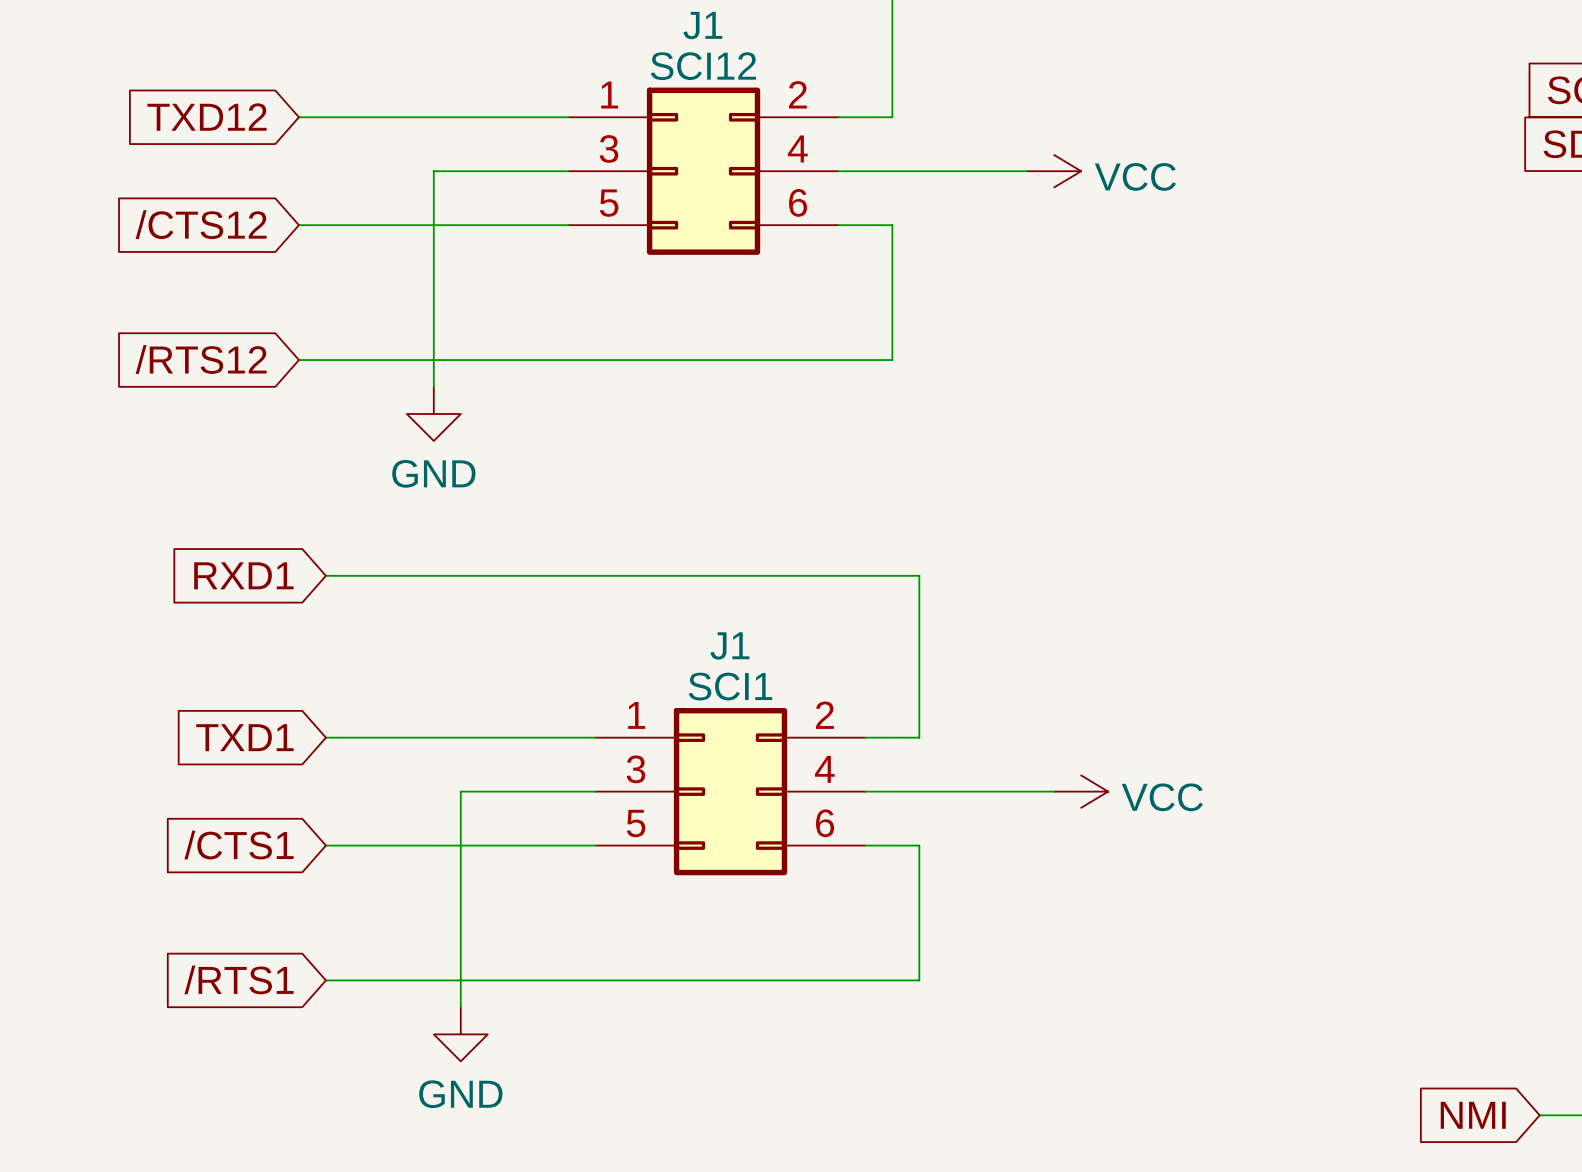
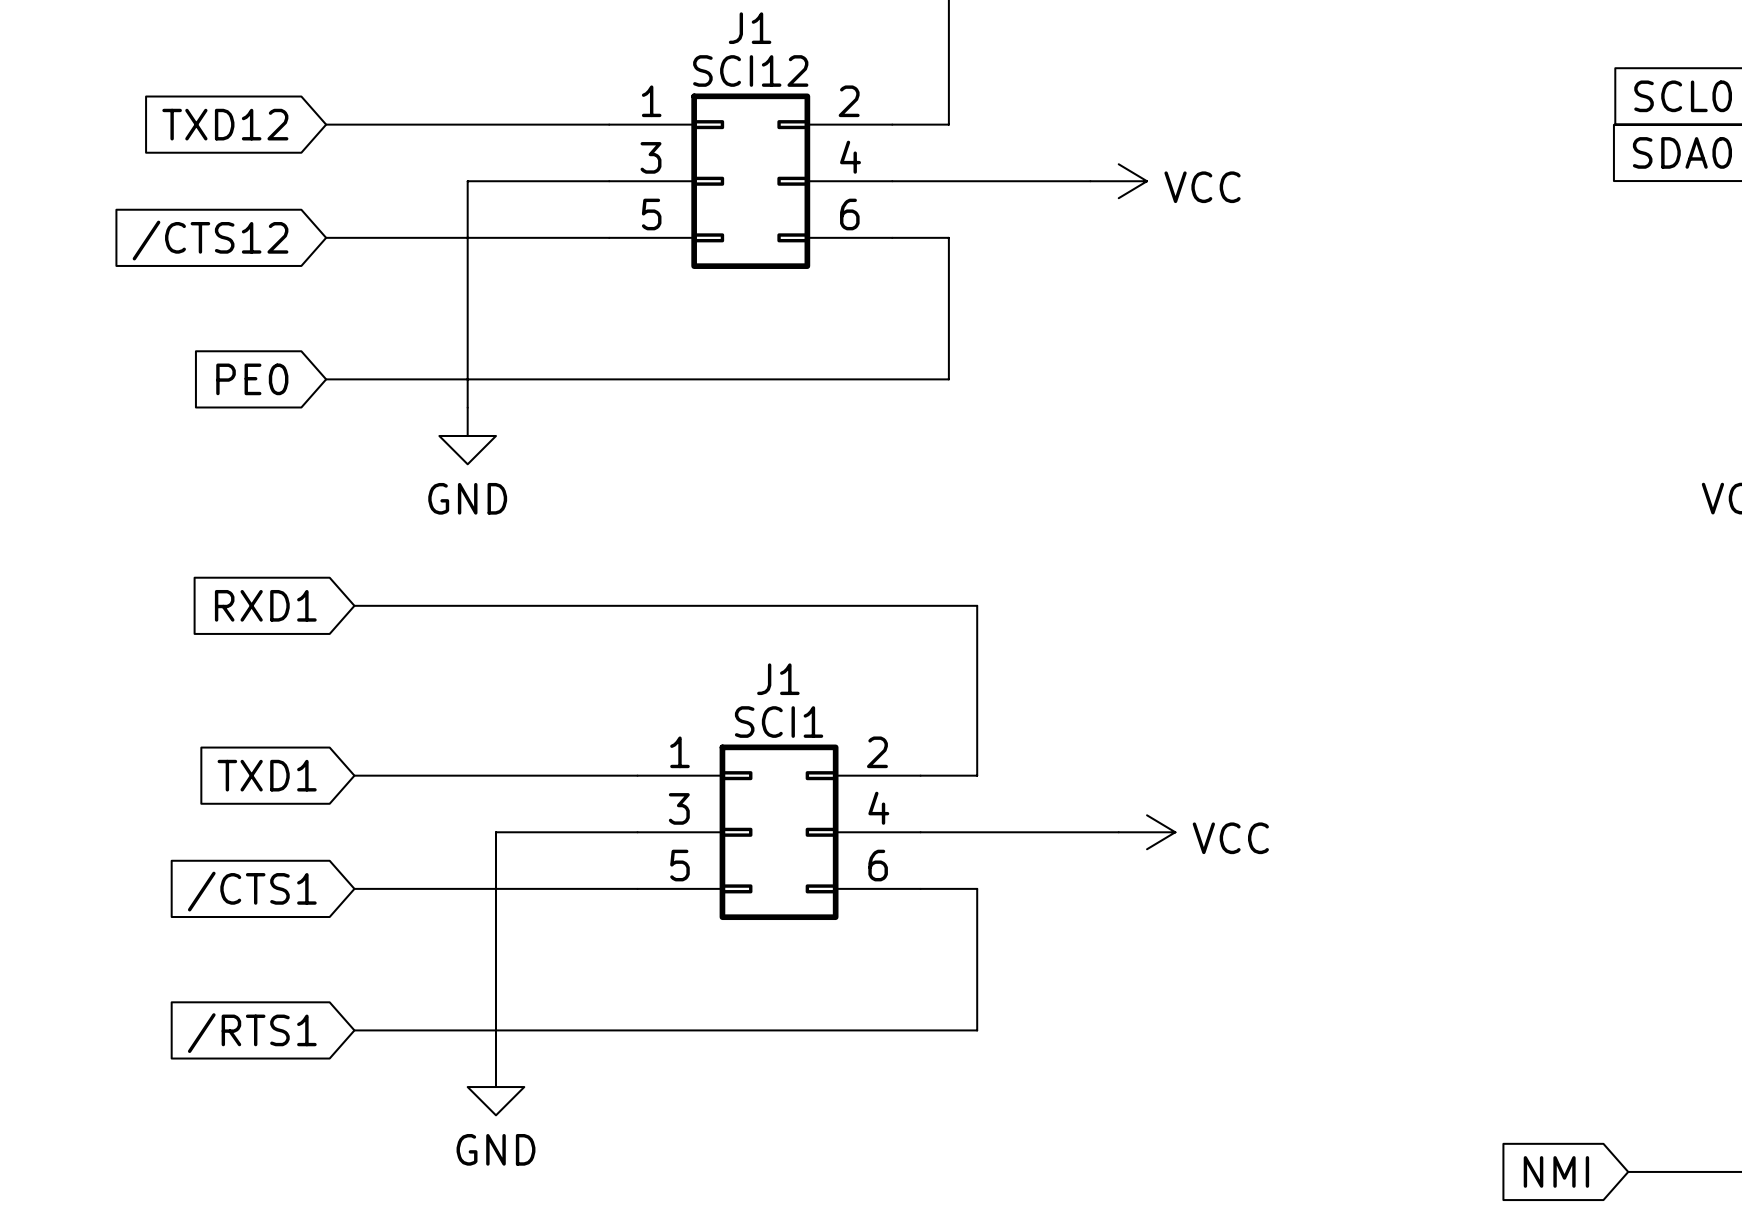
global label: /RTS12 (201, 359) -> PE0 (252, 379)

